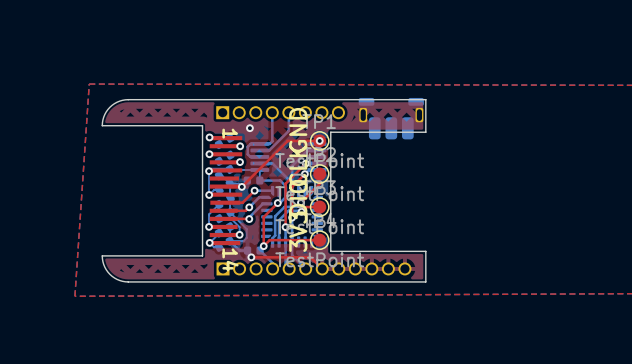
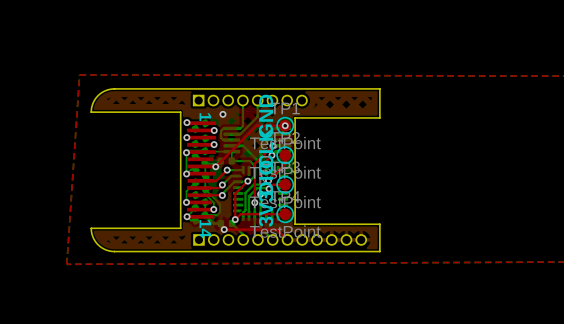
part: (391, 118) -> none

